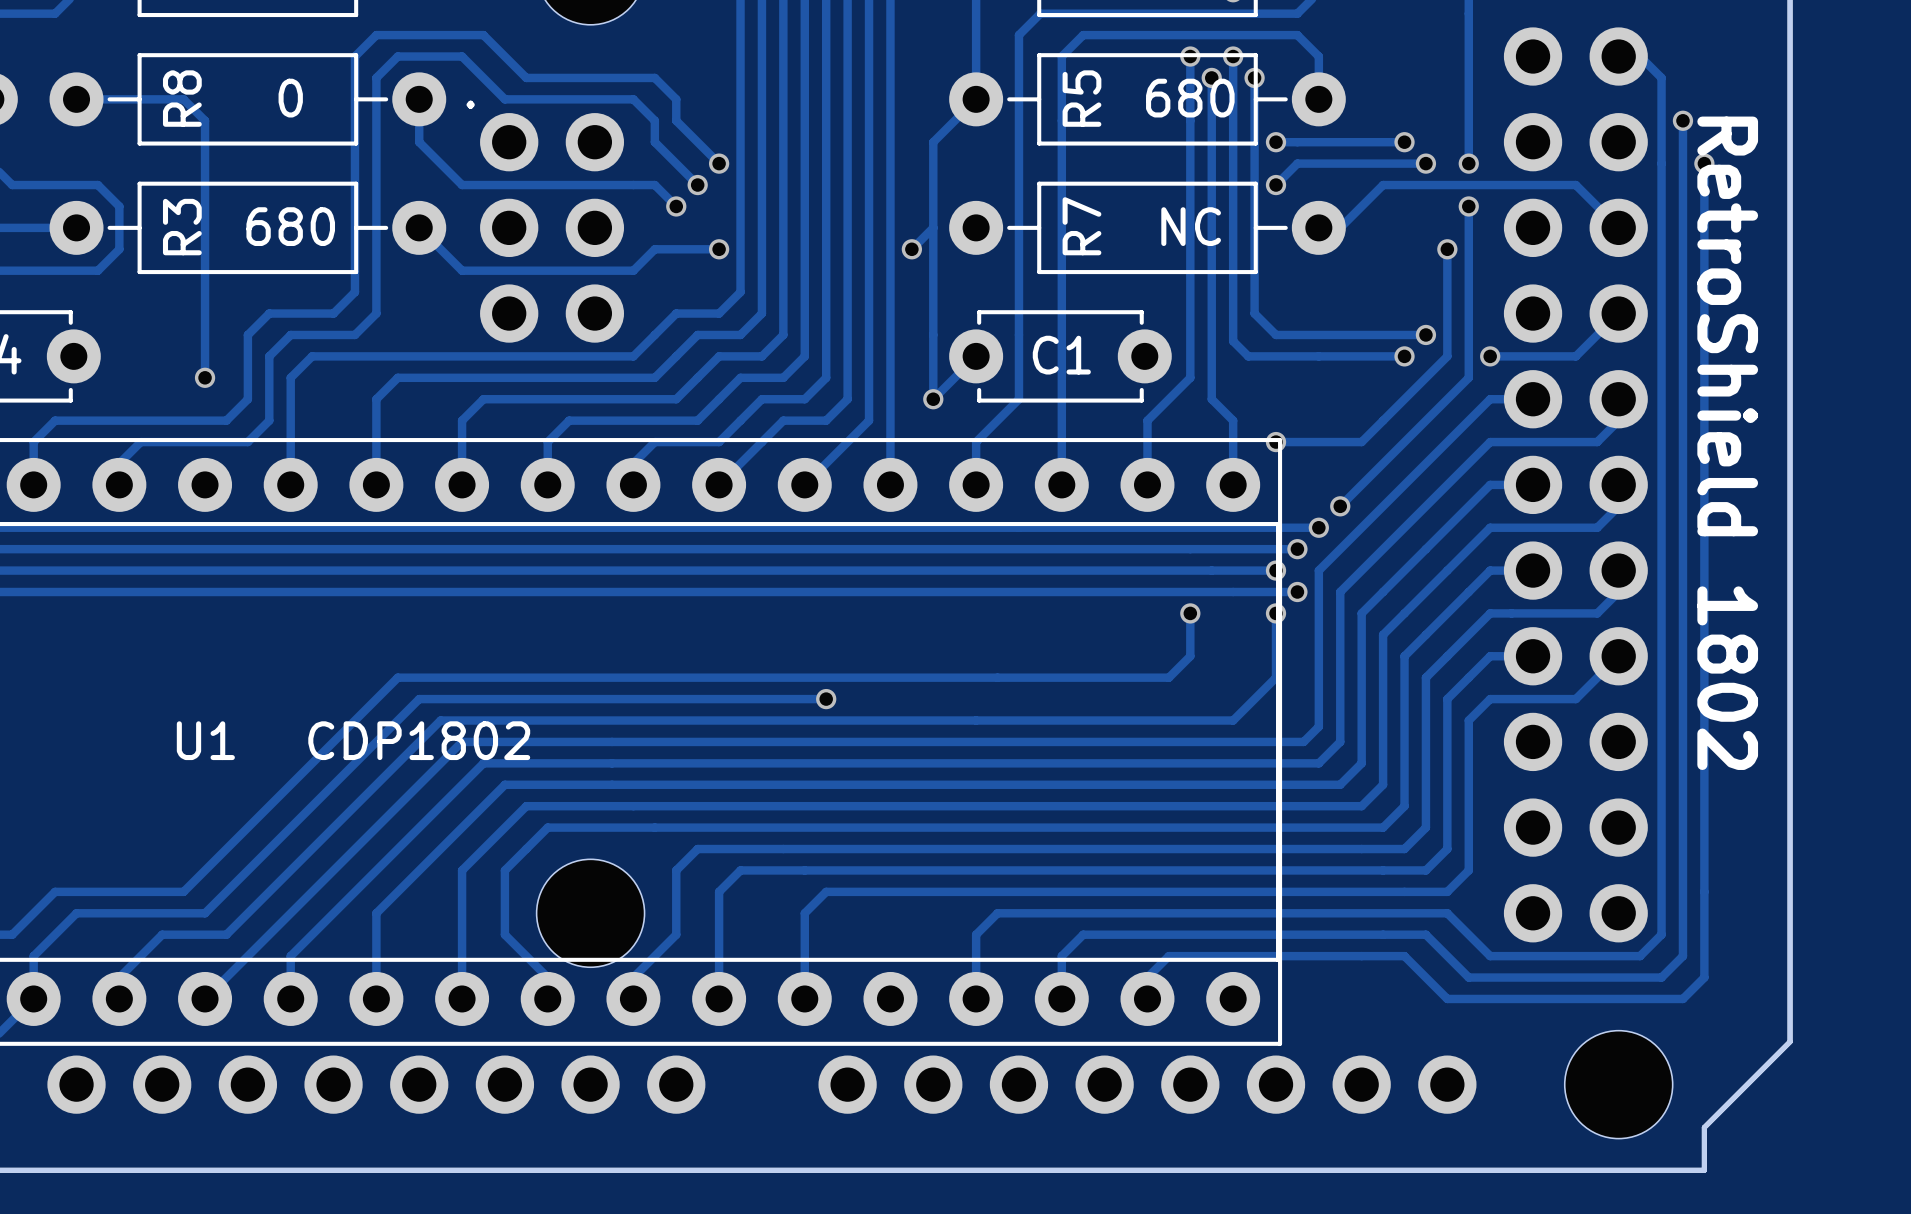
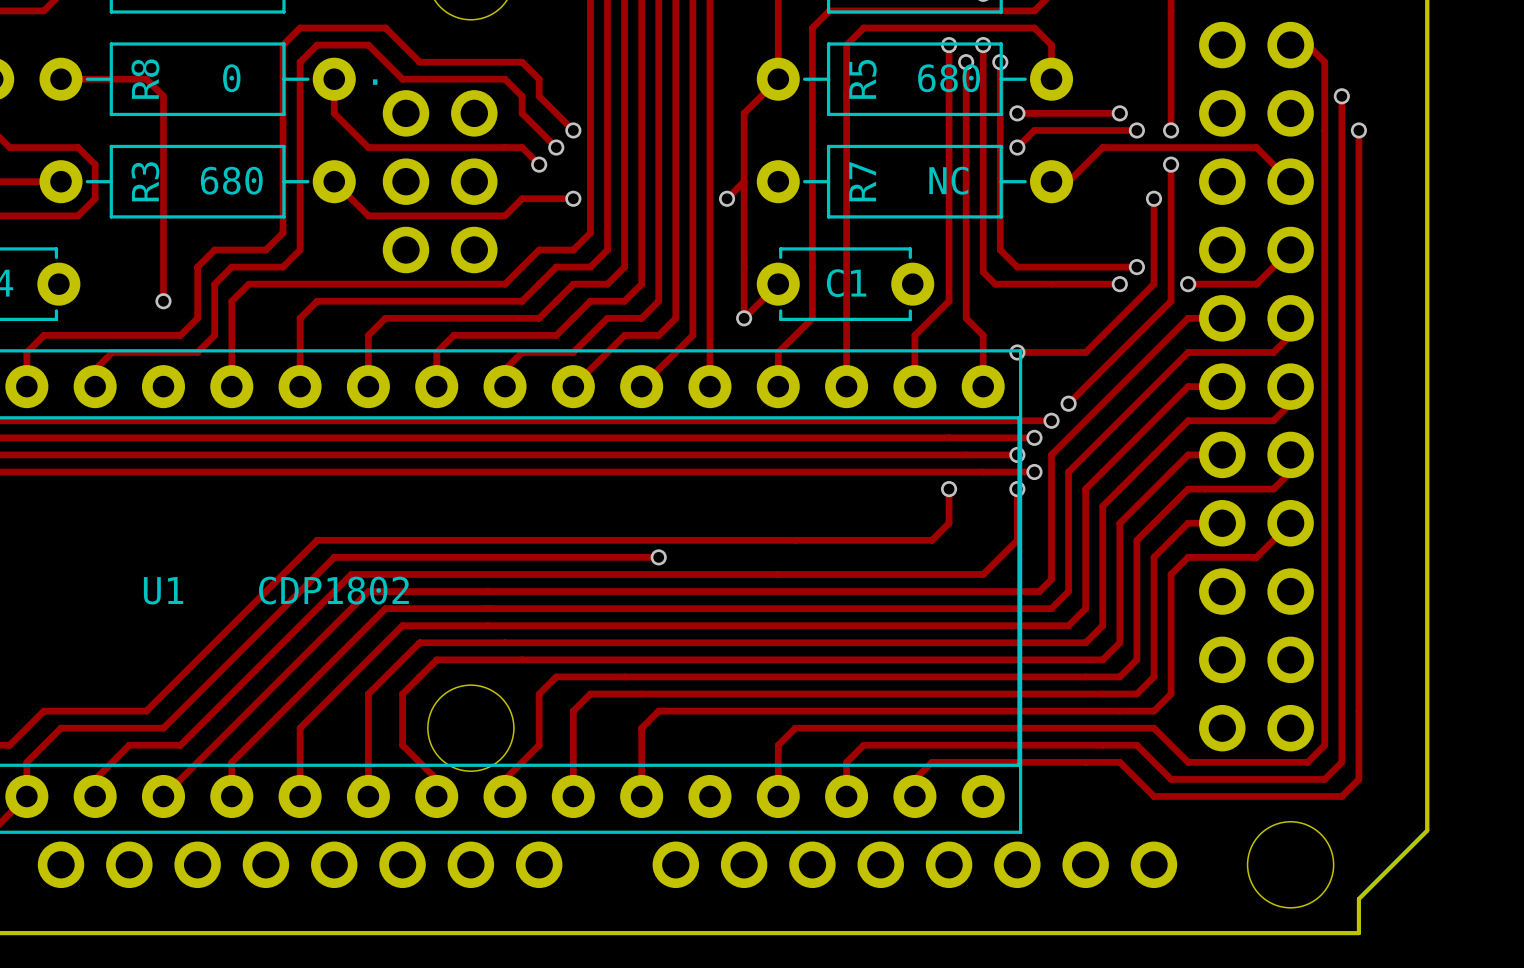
text: RetroShield 1802 (1727, 443) -> none

